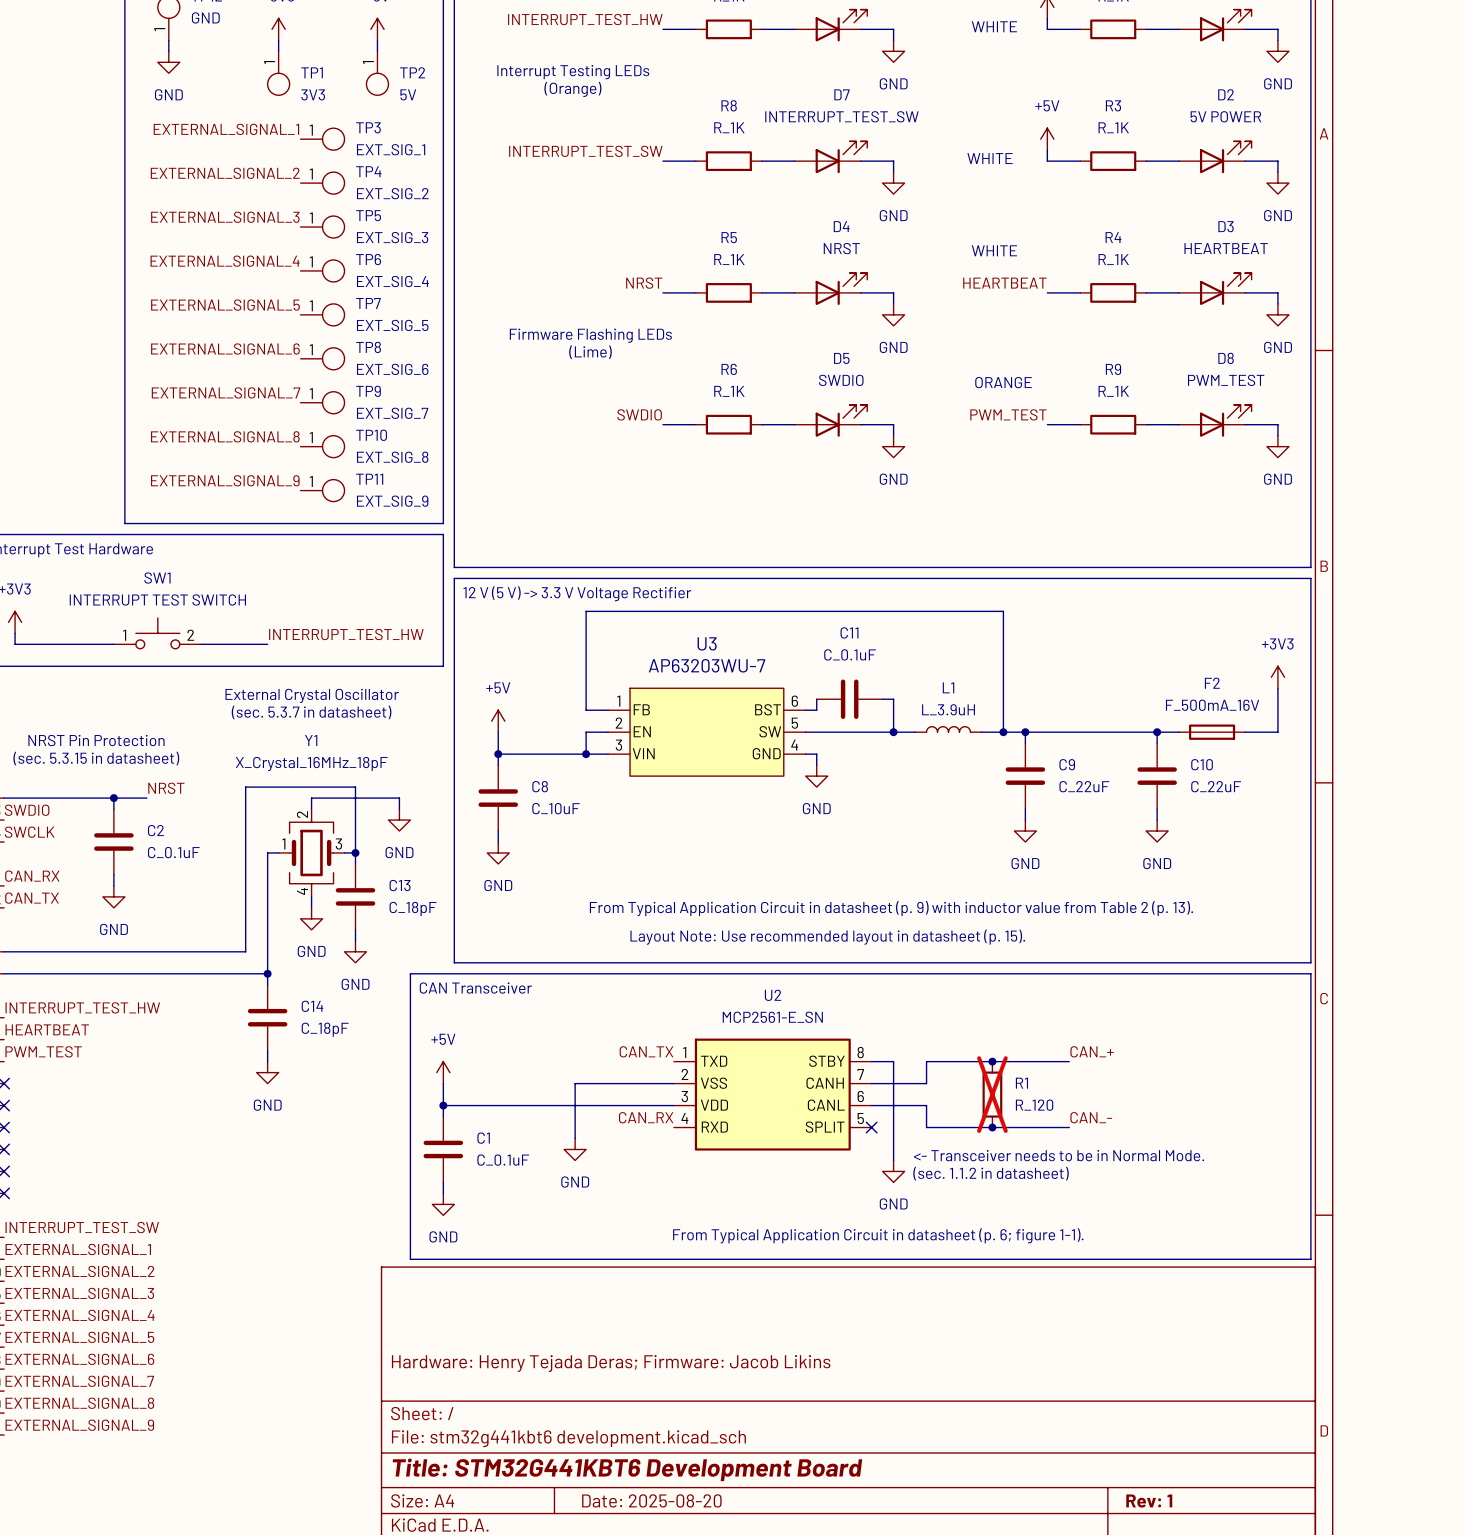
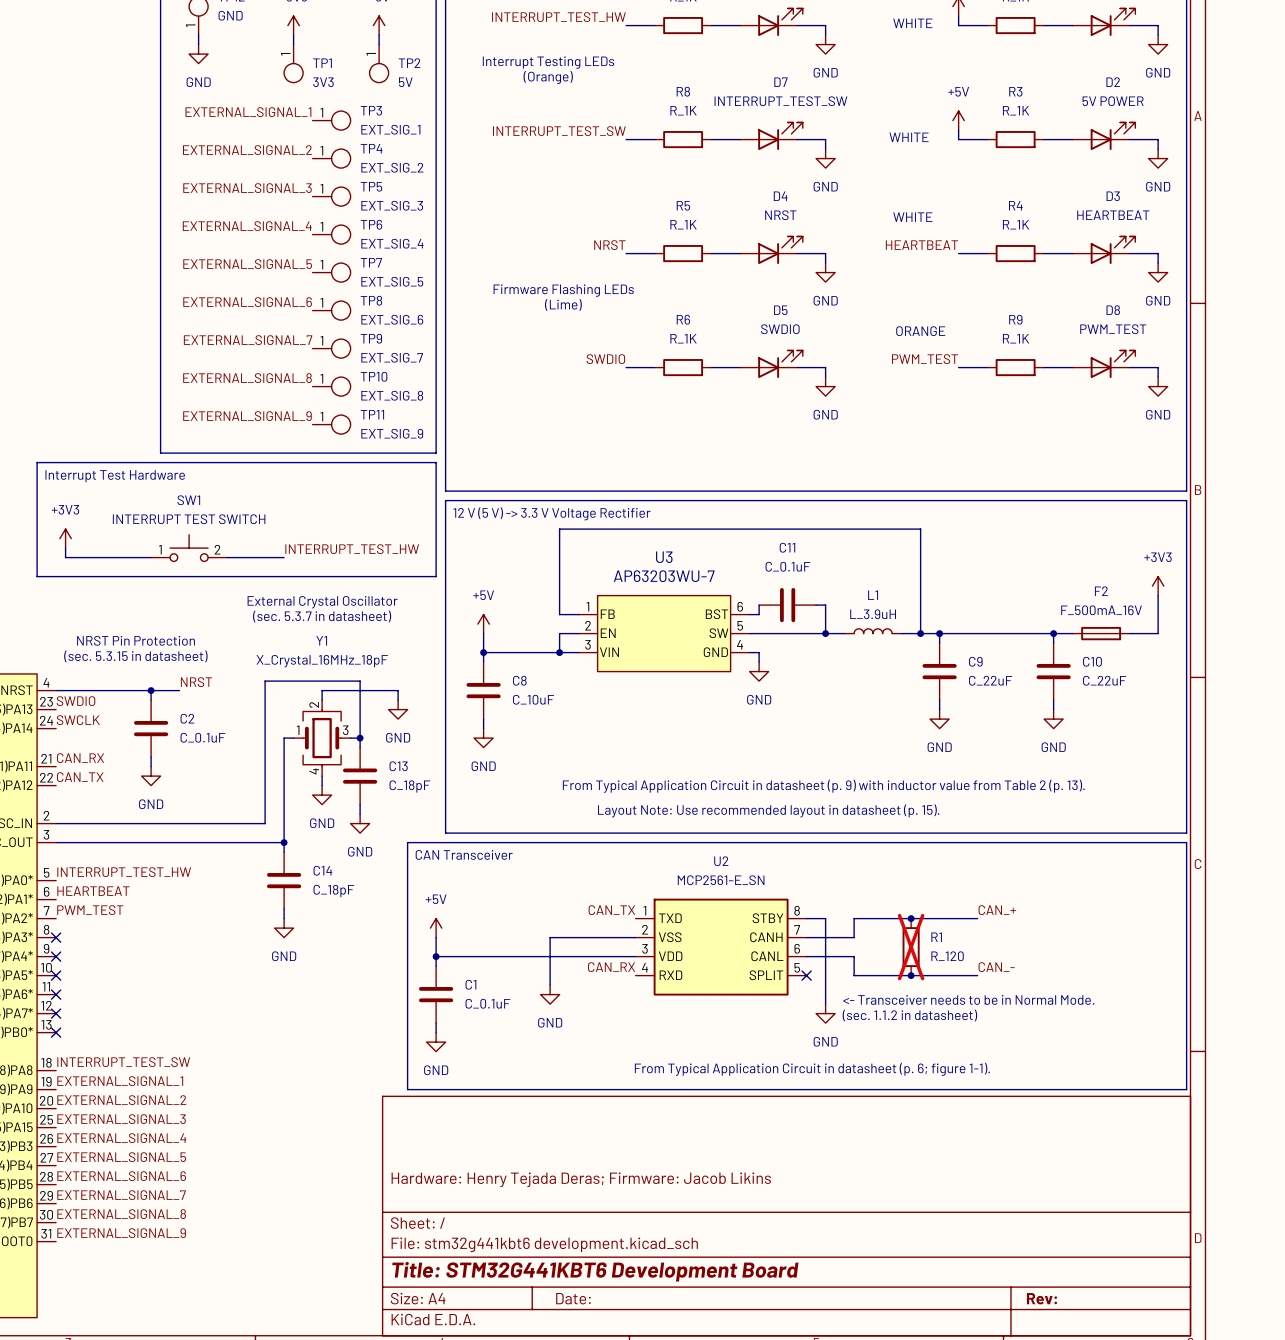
title block: Date: 2025-08-20 (651, 1500) -> Date: (573, 1298)
title block: Rev: 1 (1149, 1501) -> Rev: (1041, 1298)

